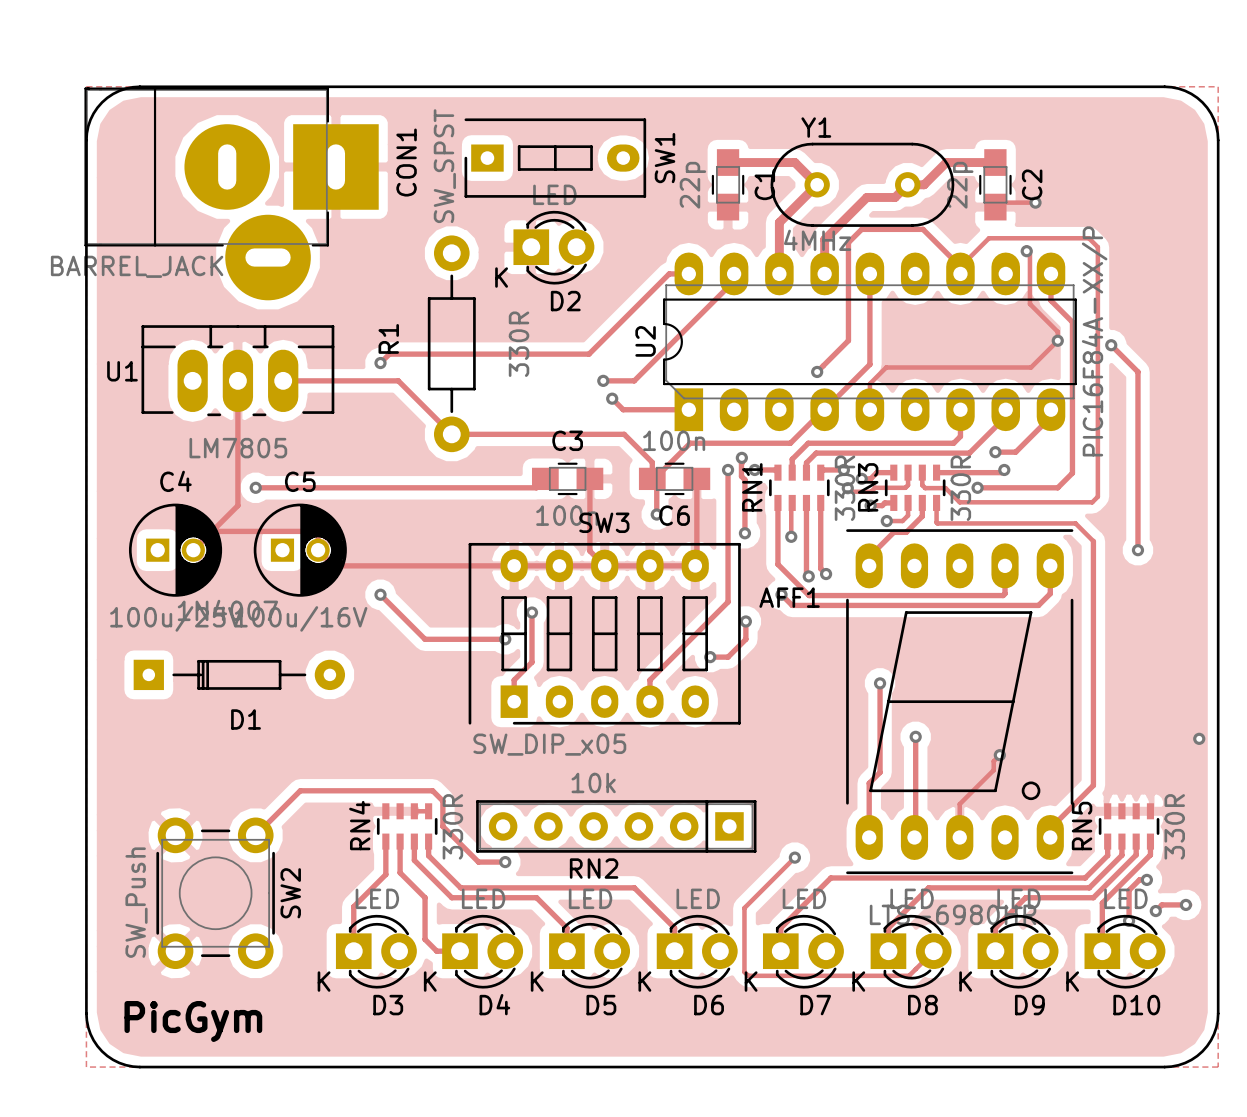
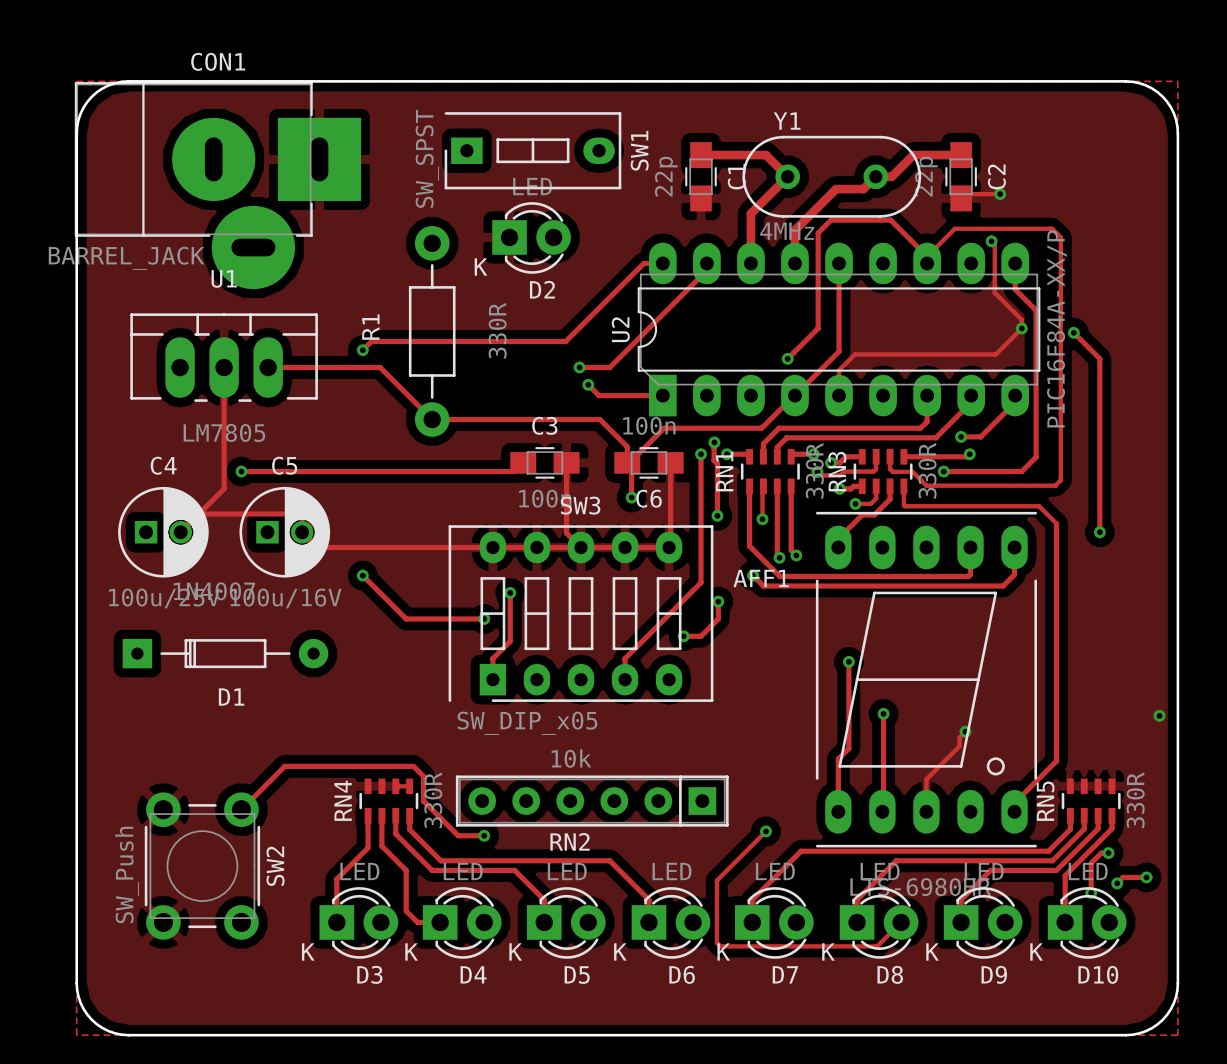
CON1 name rotation: 0° (406, 162) -> 90° clockwise (218, 61)
CON1 name position: CON1 (406, 162) -> CON1 (218, 61)
U1 name position: U1 (122, 371) -> U1 (224, 278)
text: PicGym (193, 1021) -> none

